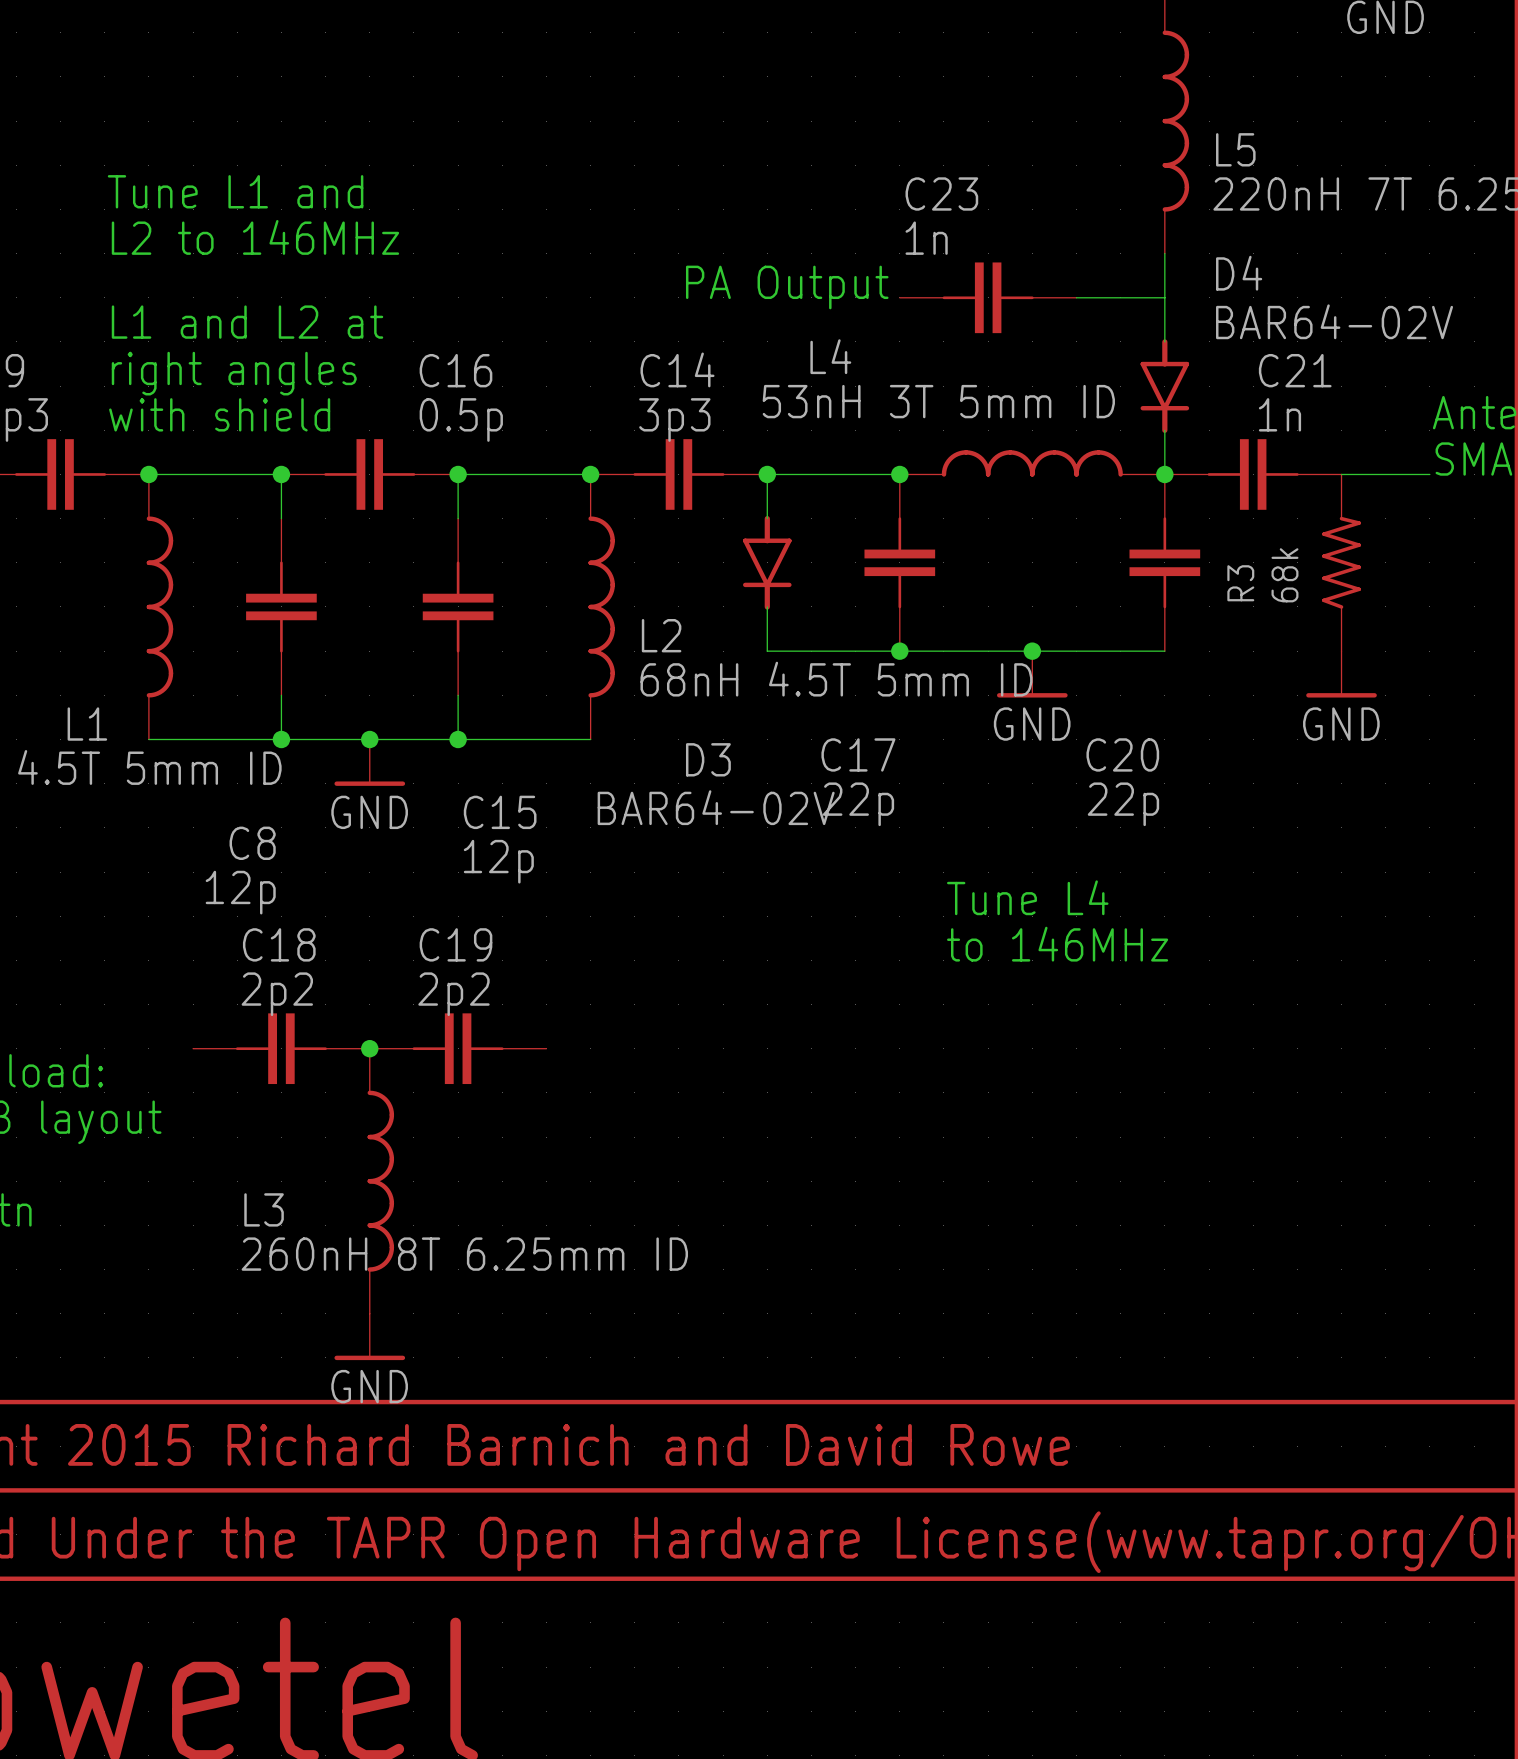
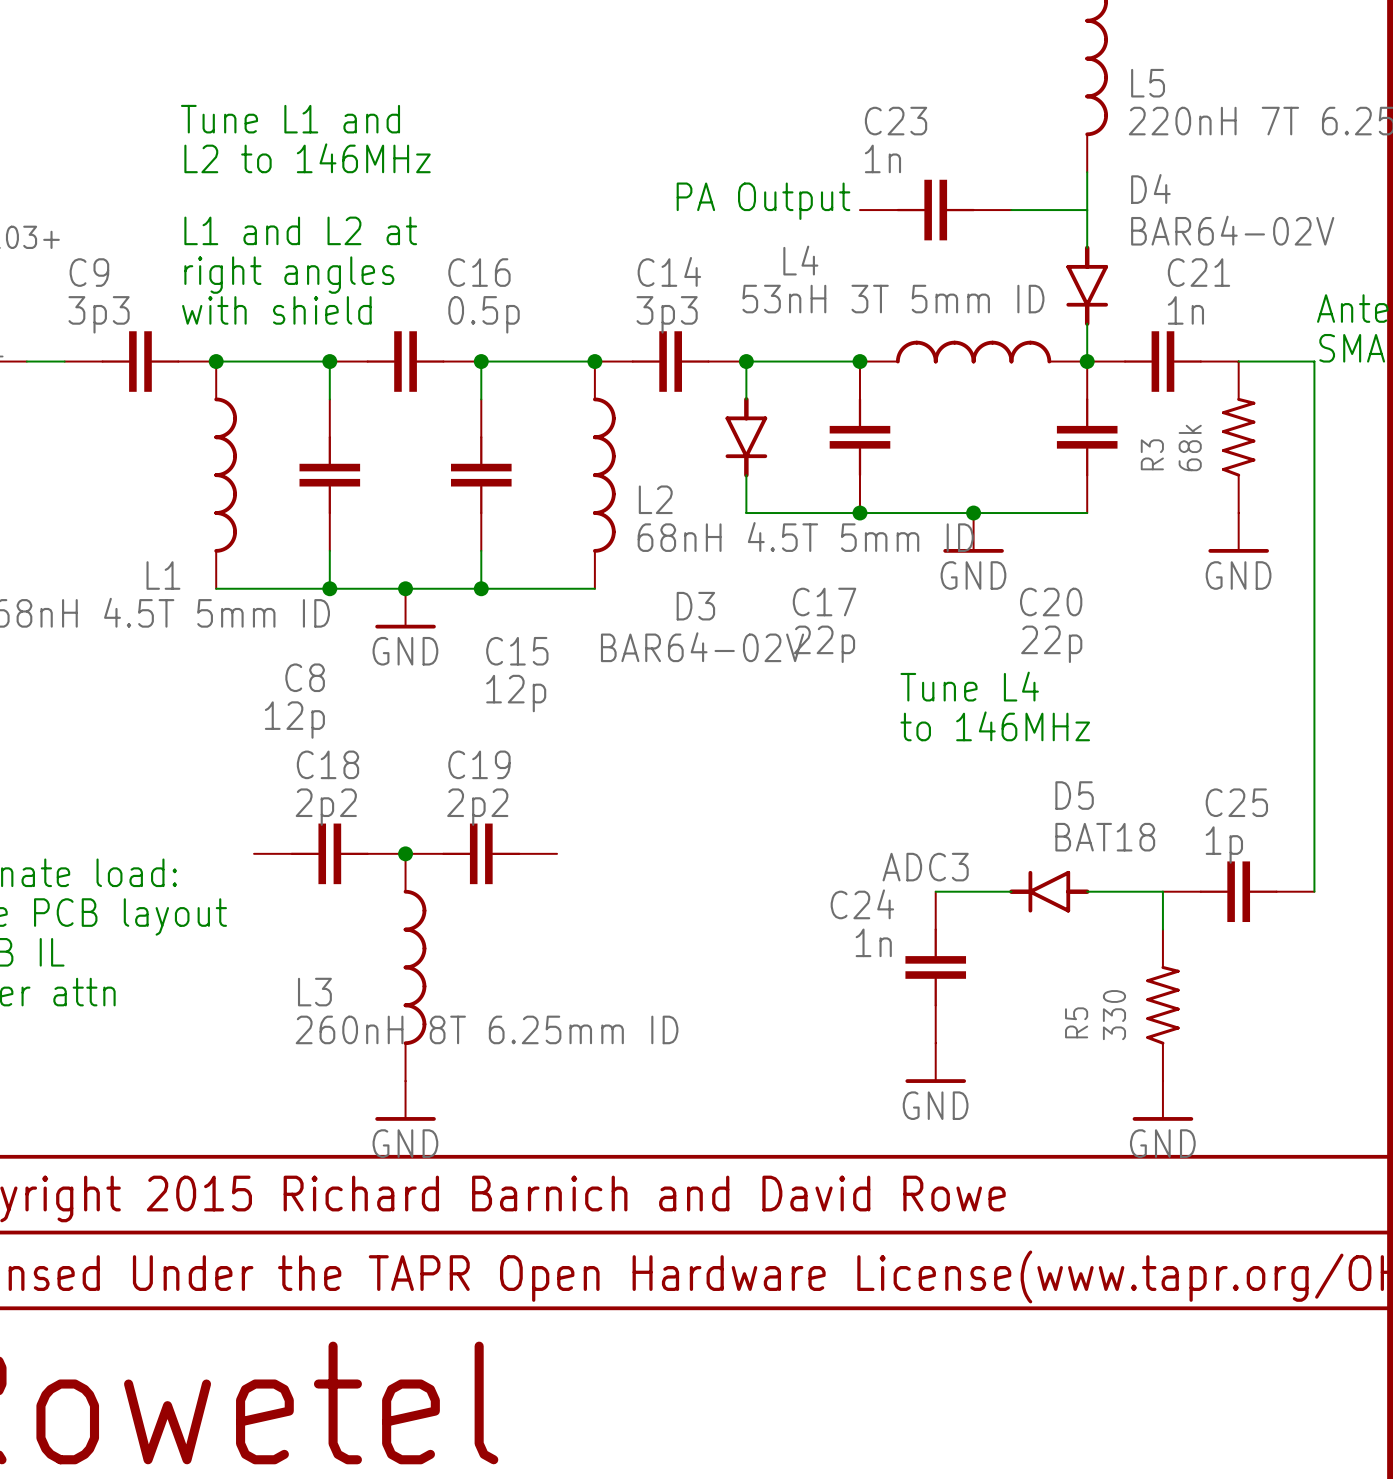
wire: none -> (1314, 361) (1314, 891)
text position: Tune L4 (1027, 897) -> Tune L4 (969, 686)
text position: to 146MHz (1057, 944) -> to 146MHz (995, 726)
label: none -> ADC3 (925, 867)
wire: none -> (935, 891) (1011, 891)
D5: none -> BAT18 (1049, 891)
wire: none -> (1087, 891) (1162, 891) (1162, 929)
C25: none -> 1p (1238, 891)
C24: none -> 1n (935, 967)
R5: none -> 330 (1162, 1005)
power symbol: none -> GND (935, 1063)
power symbol: none -> GND (1162, 1100)

